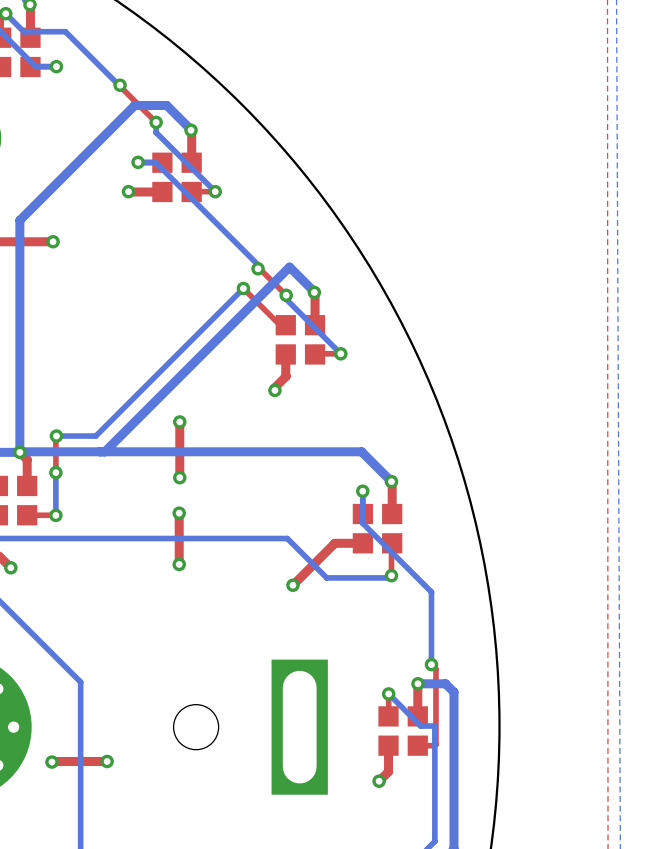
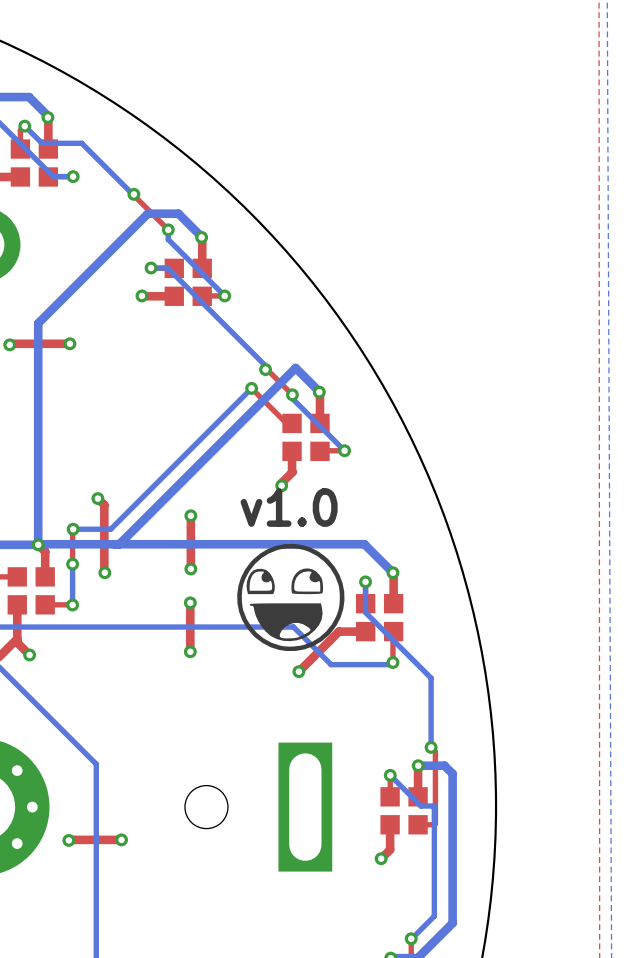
top track: none -> (97, 498) (104, 505) (104, 572)
via: none -> (97, 498)
text: none -> v1.0 (289, 507)
drawing: none -> [237, 543, 345, 652]
via: none -> (104, 572)

